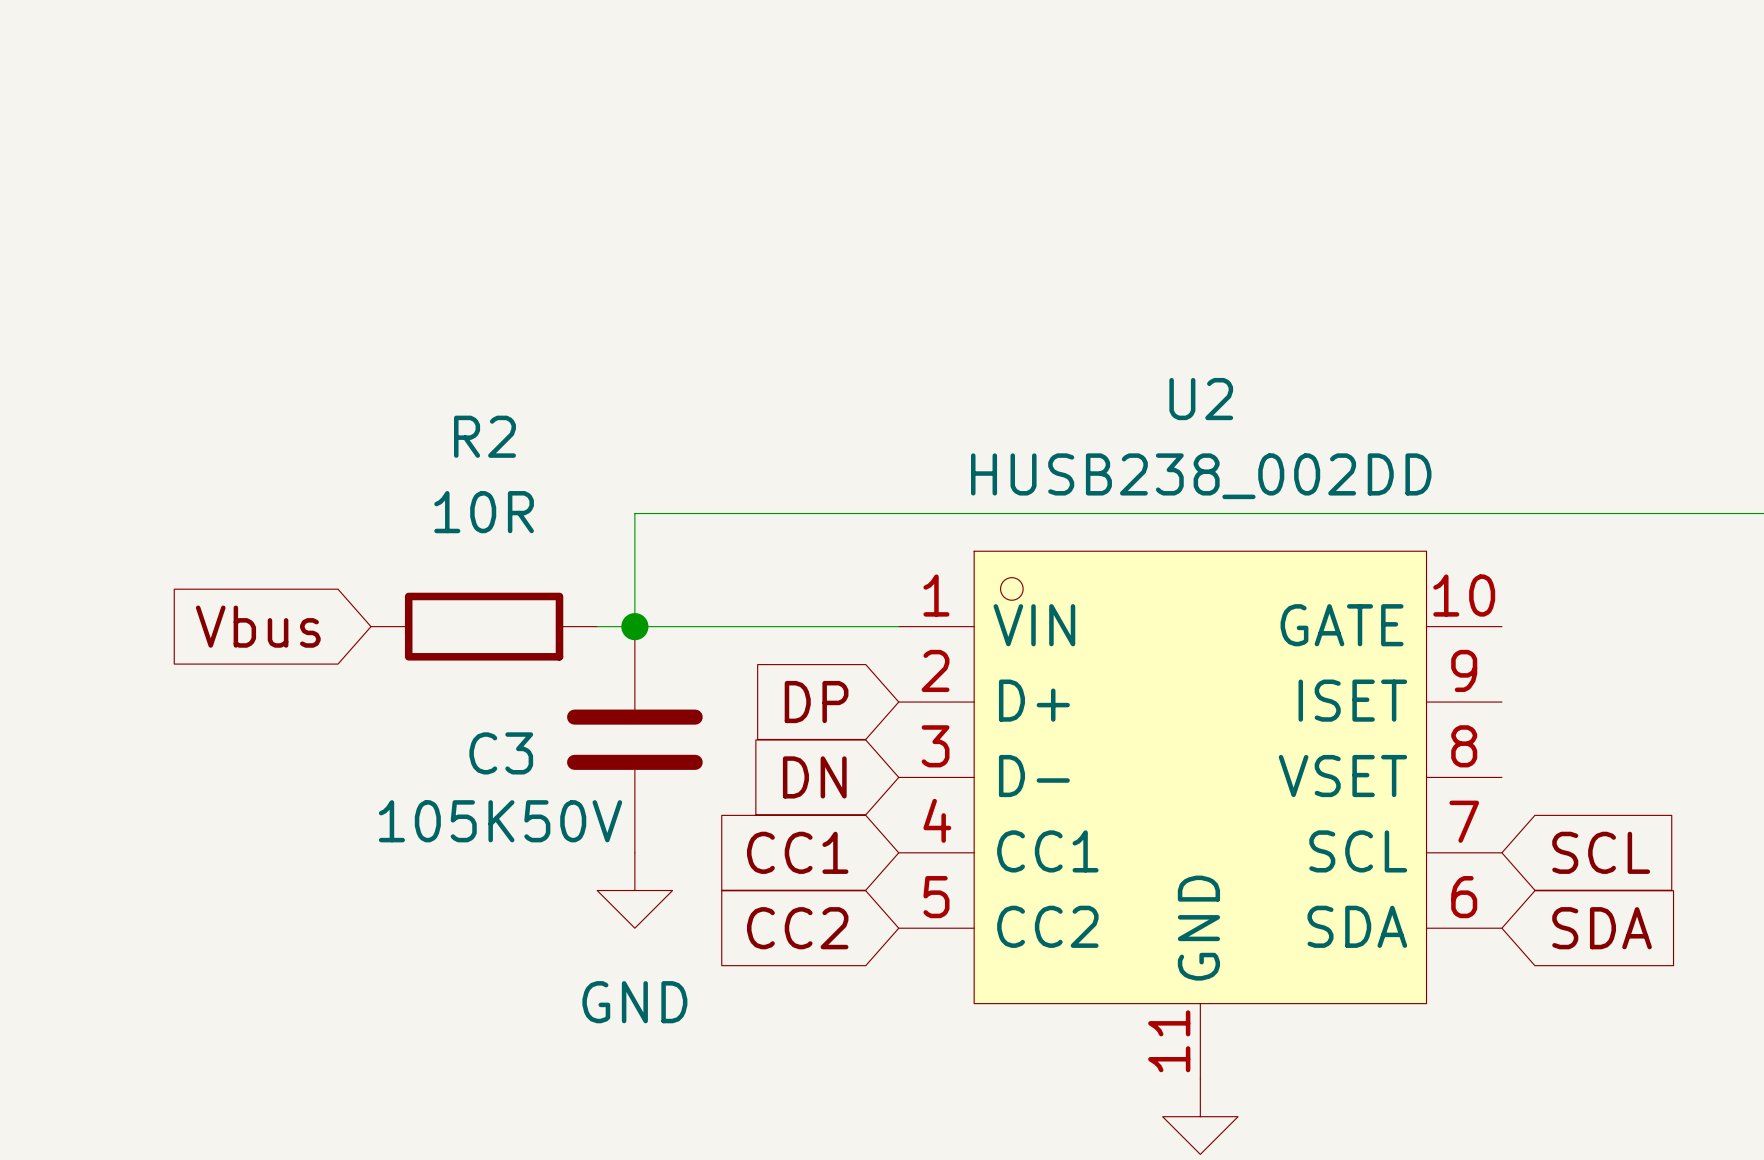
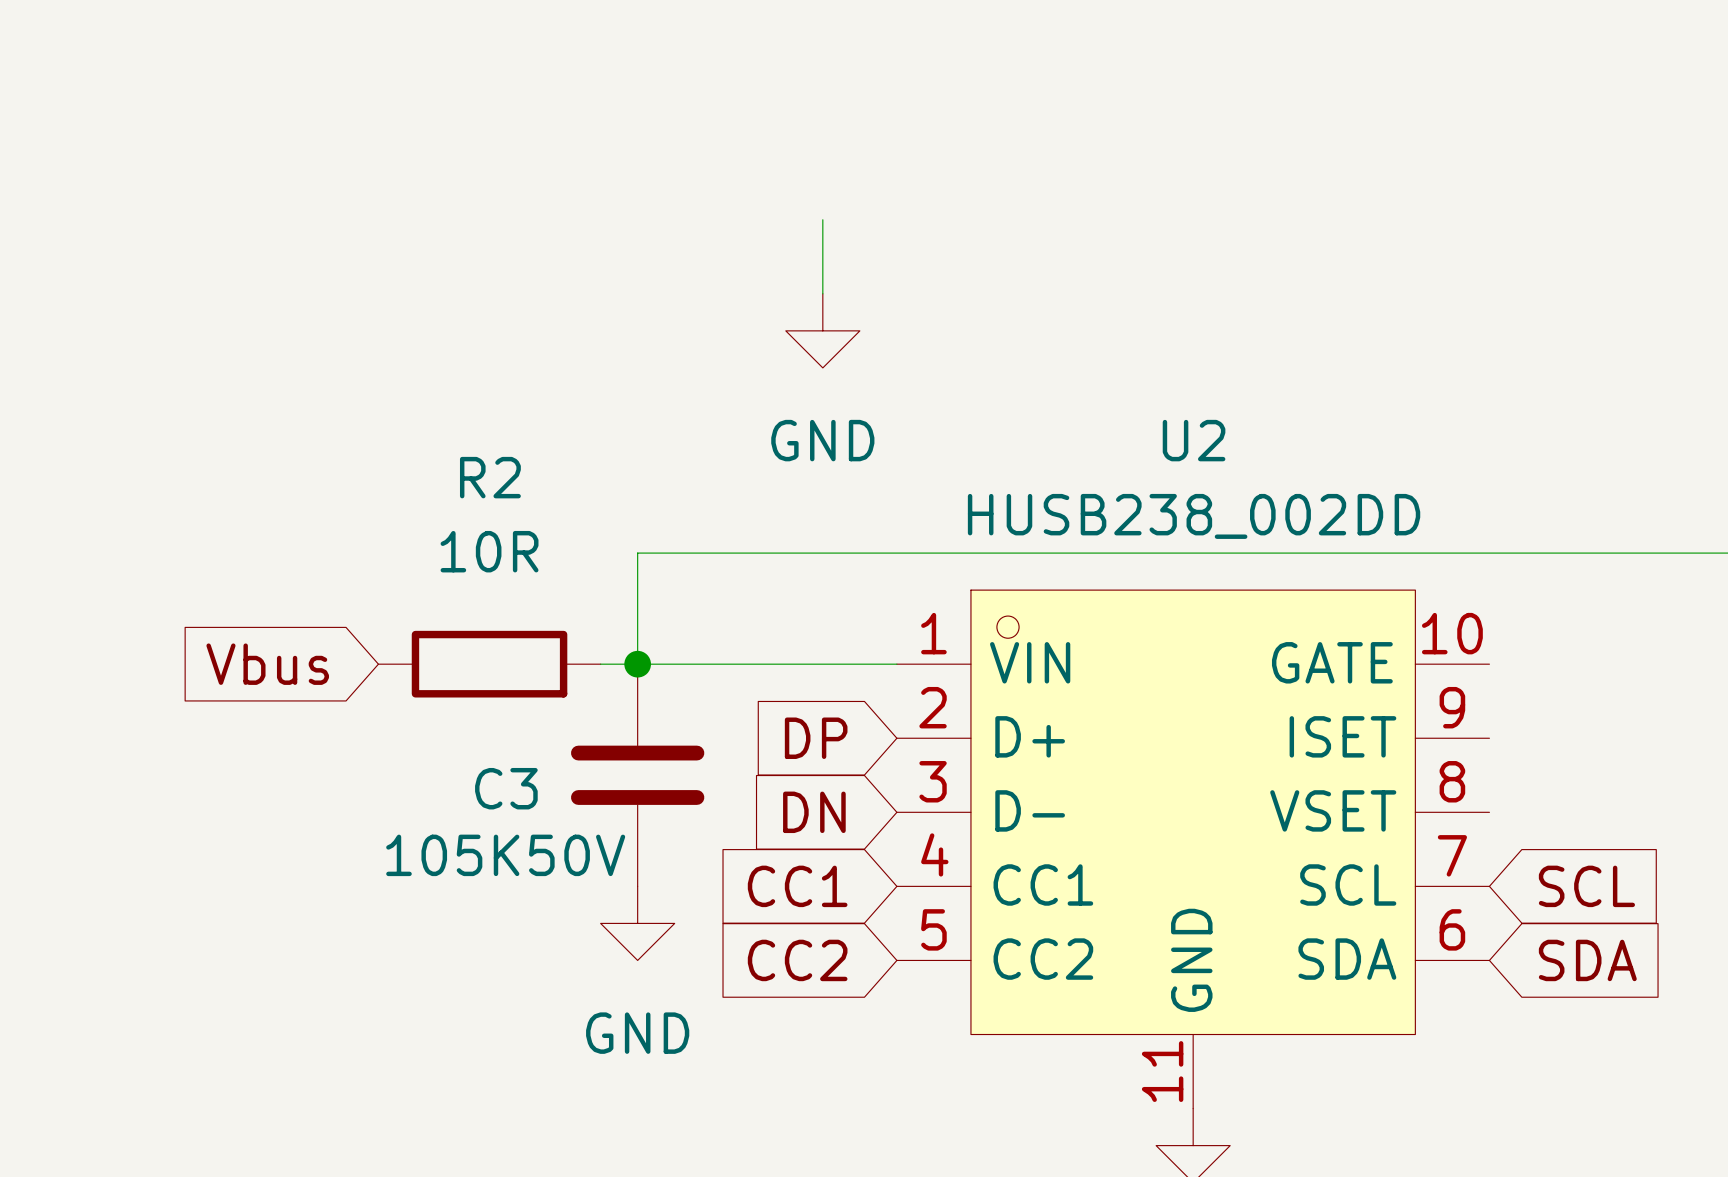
wire: none -> (822, 219) (822, 293)
power symbol: none -> GND (822, 330)

